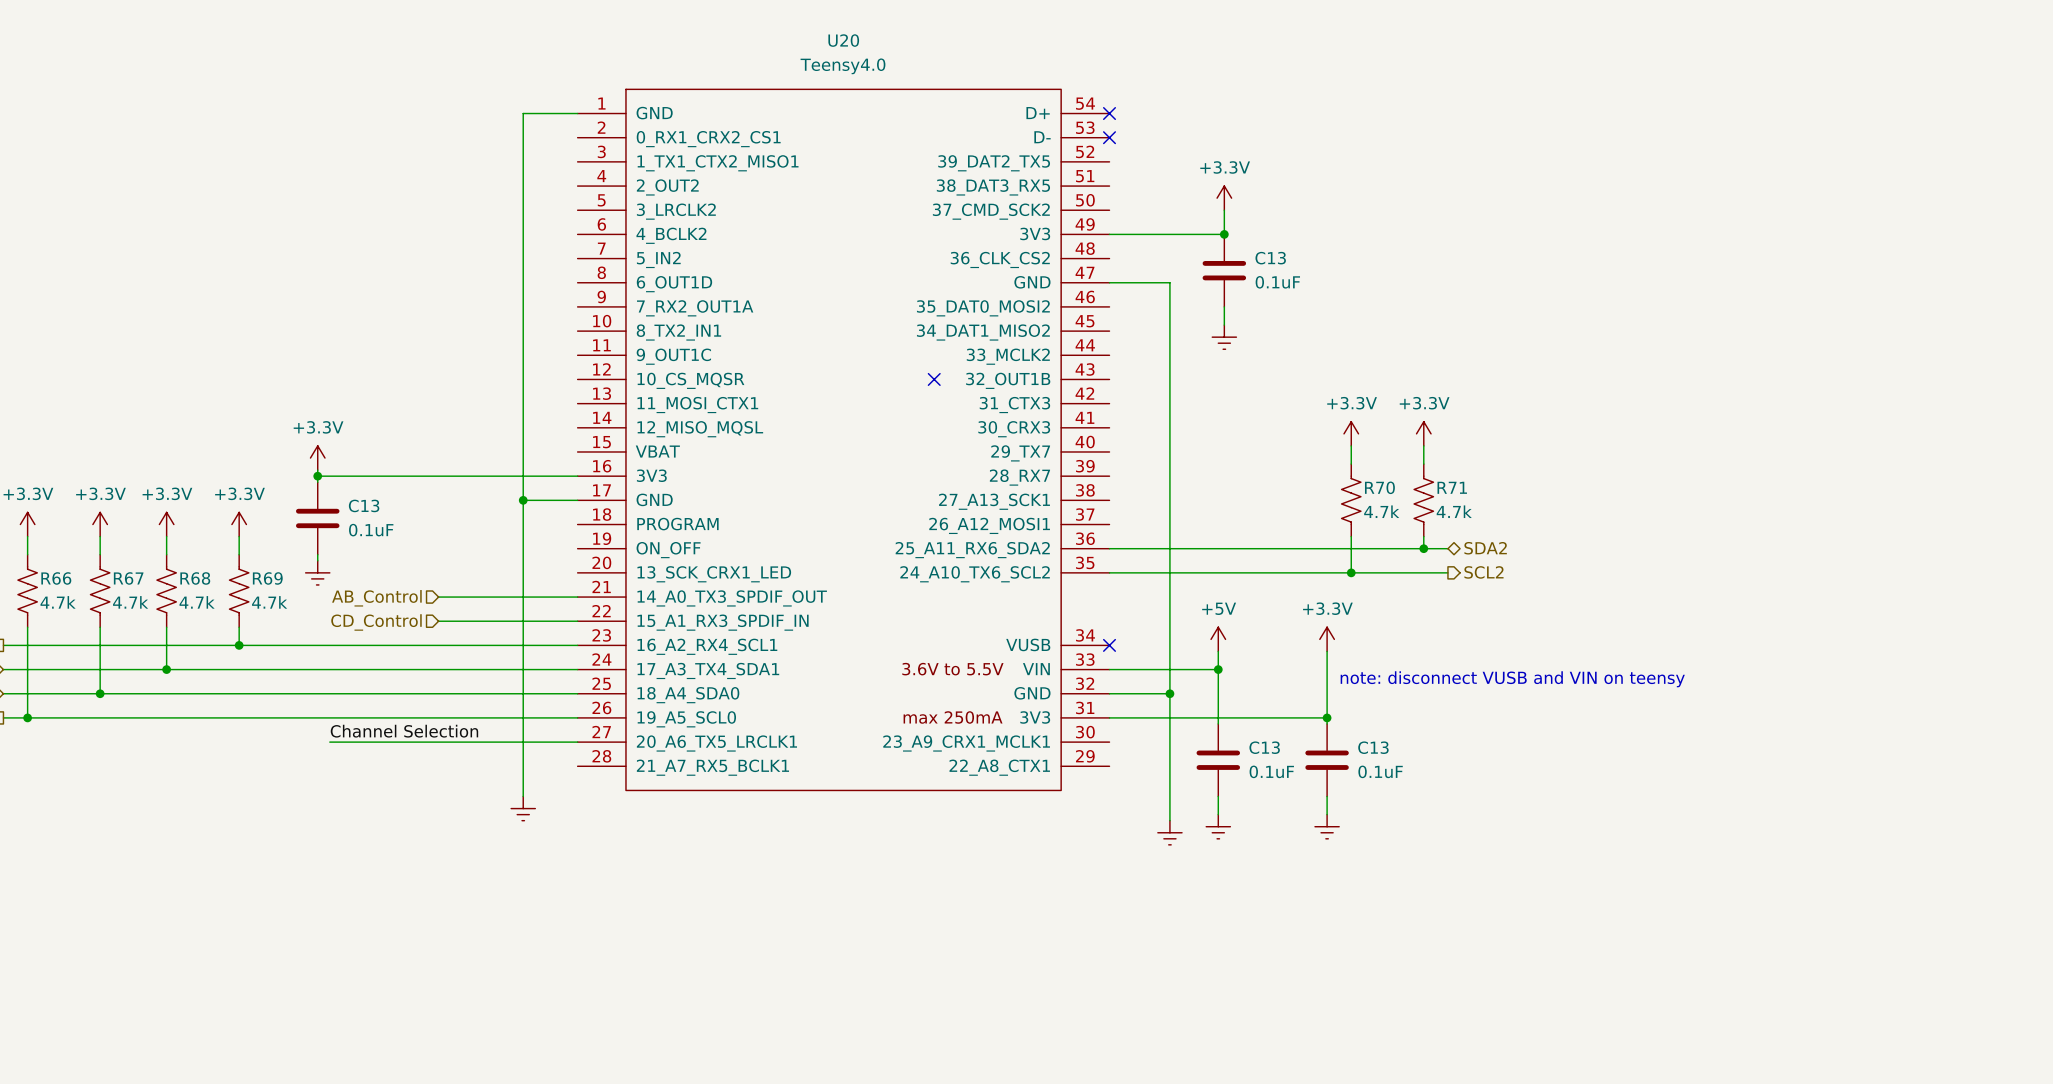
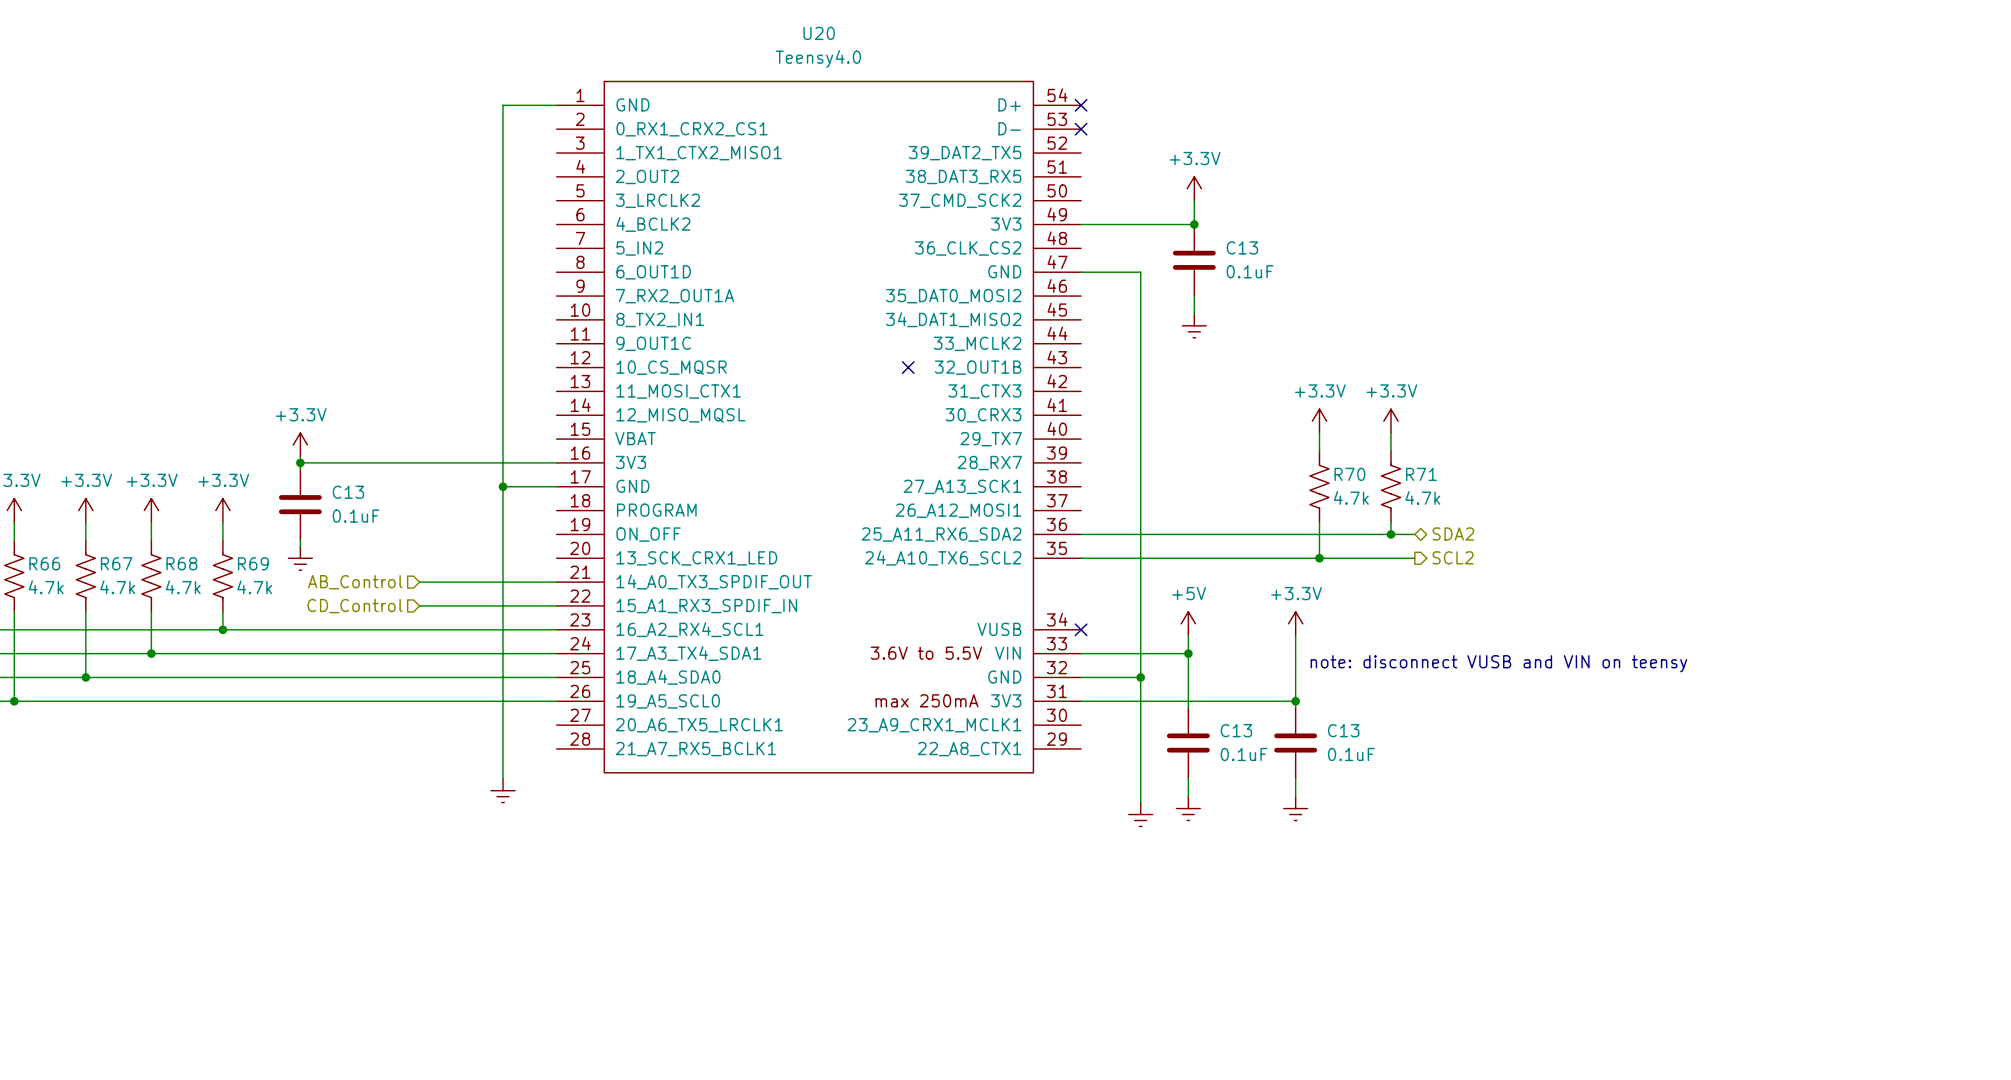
label: Channel Selection (404, 731) -> none
wire: (329, 742) (577, 742) -> none

